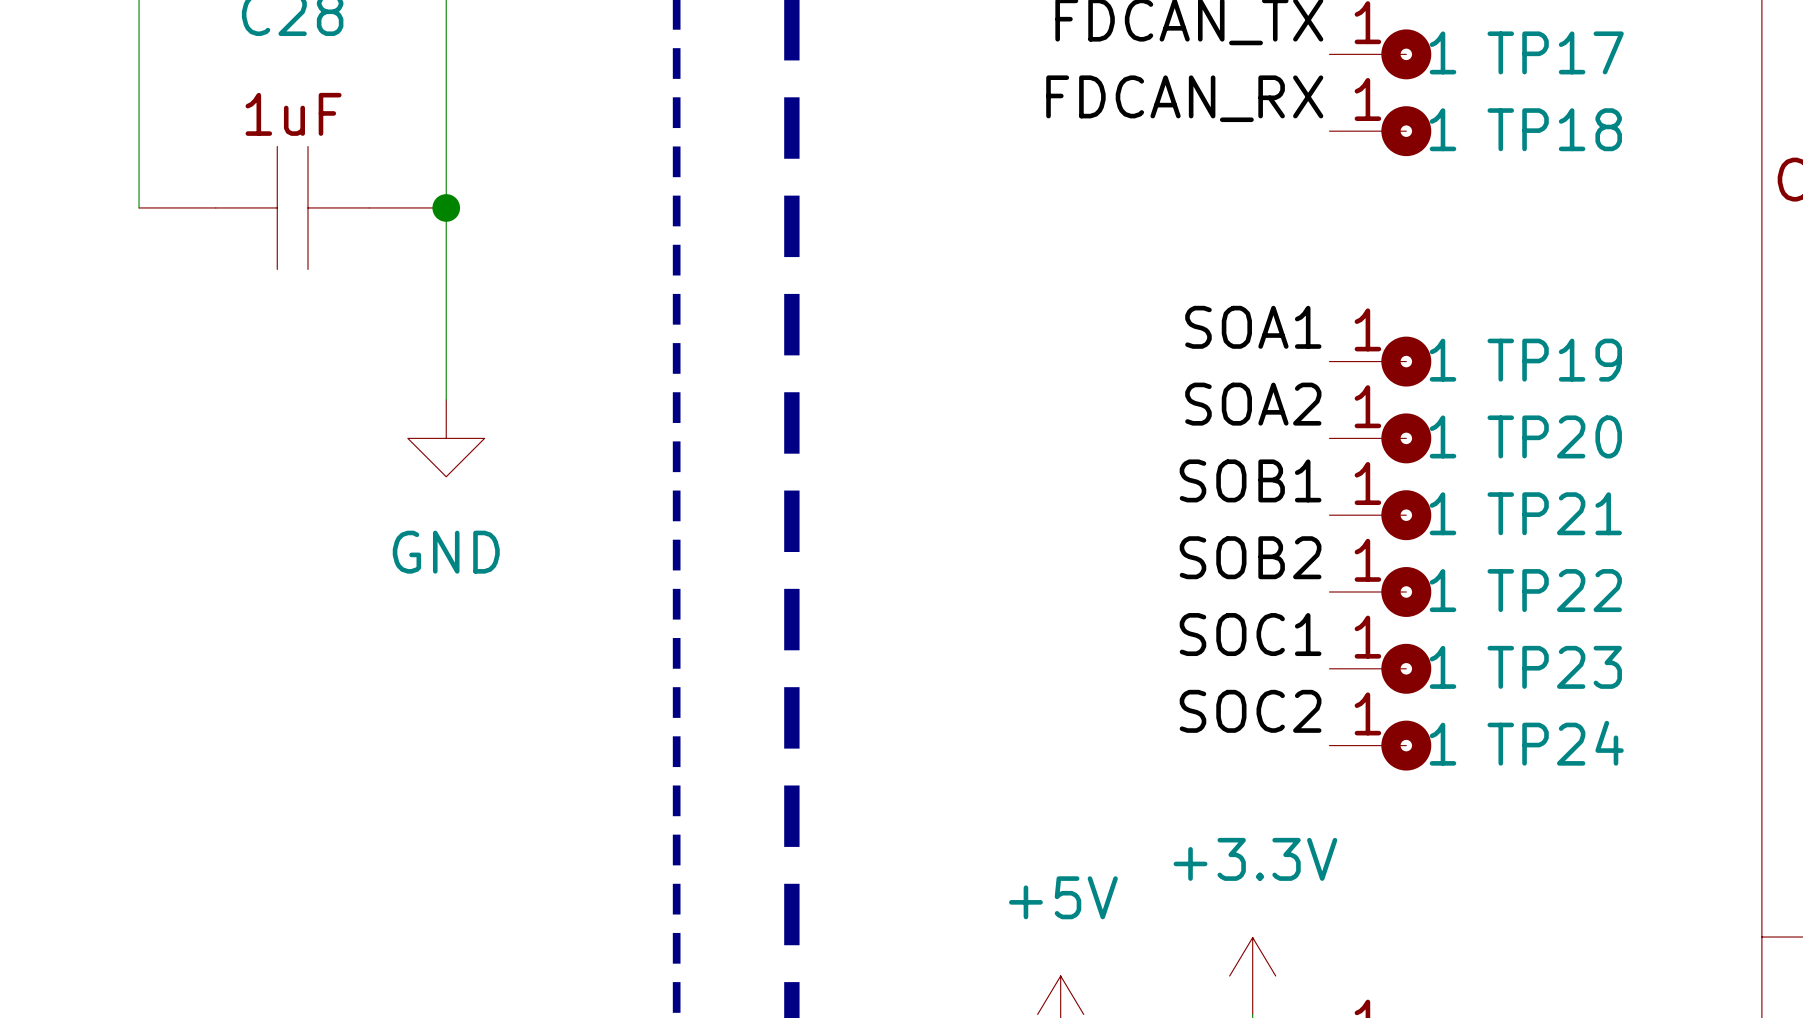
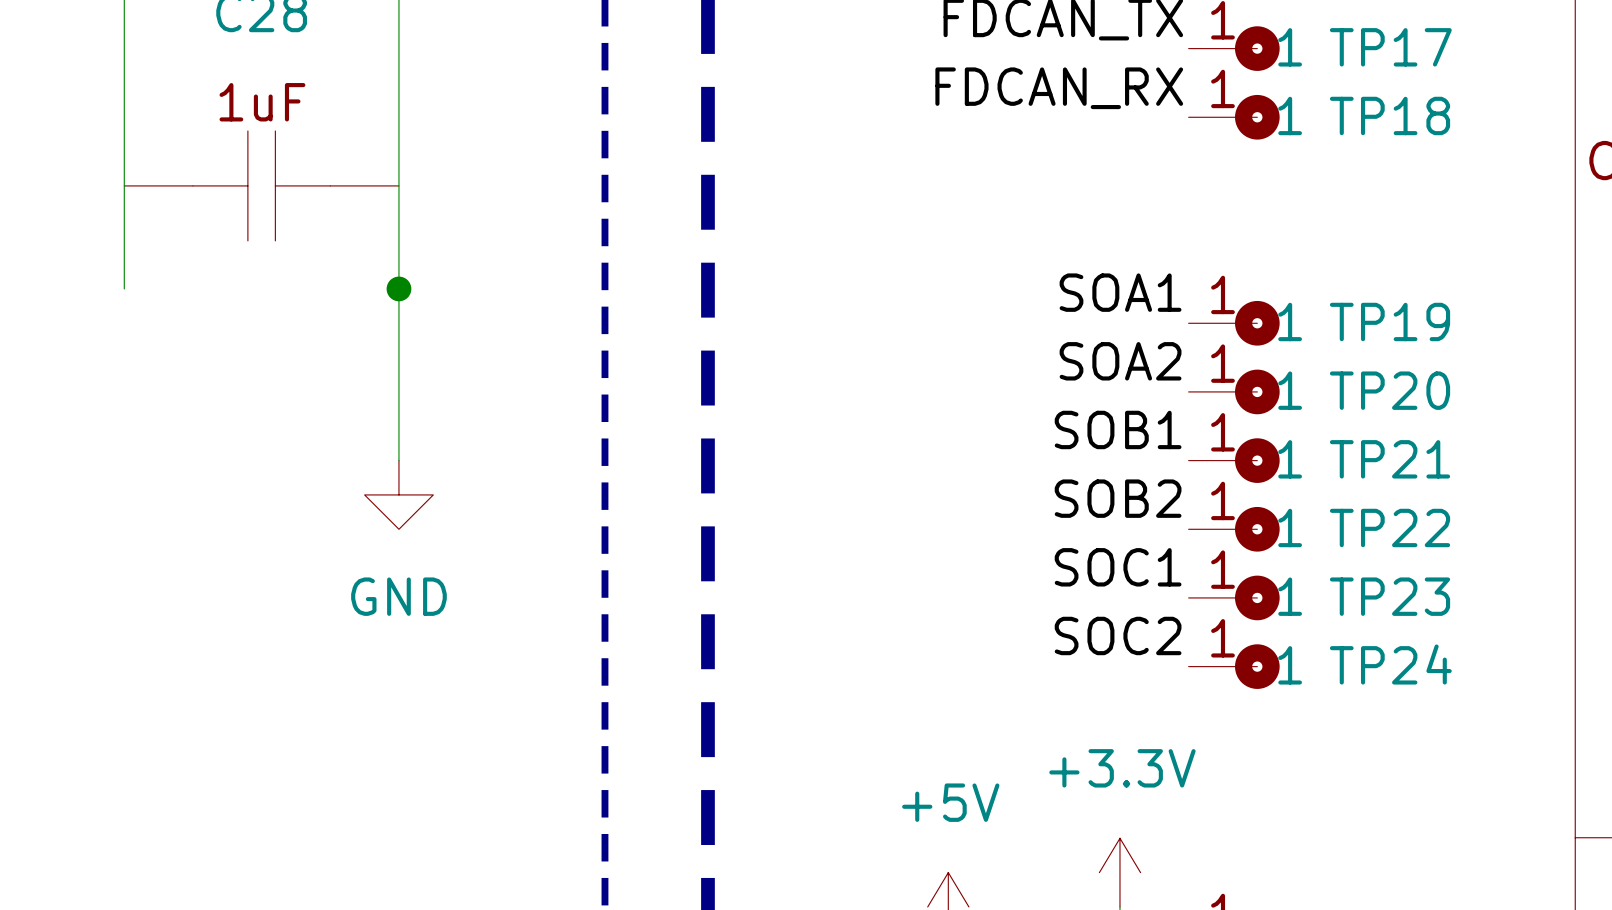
wire: none -> (124, 185) (124, 288)
junction position: (446, 207) -> (398, 288)
wire: none -> (398, 357) (398, 460)
power symbol position: GND (446, 438) -> GND (398, 494)

